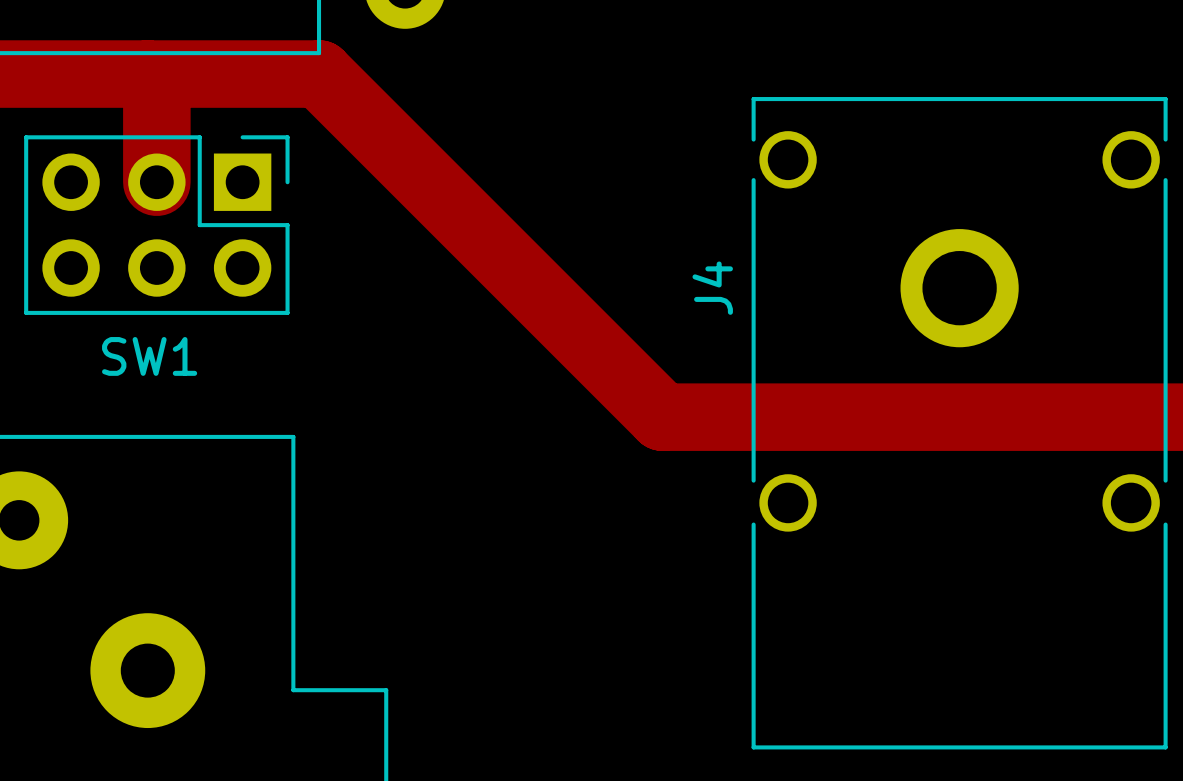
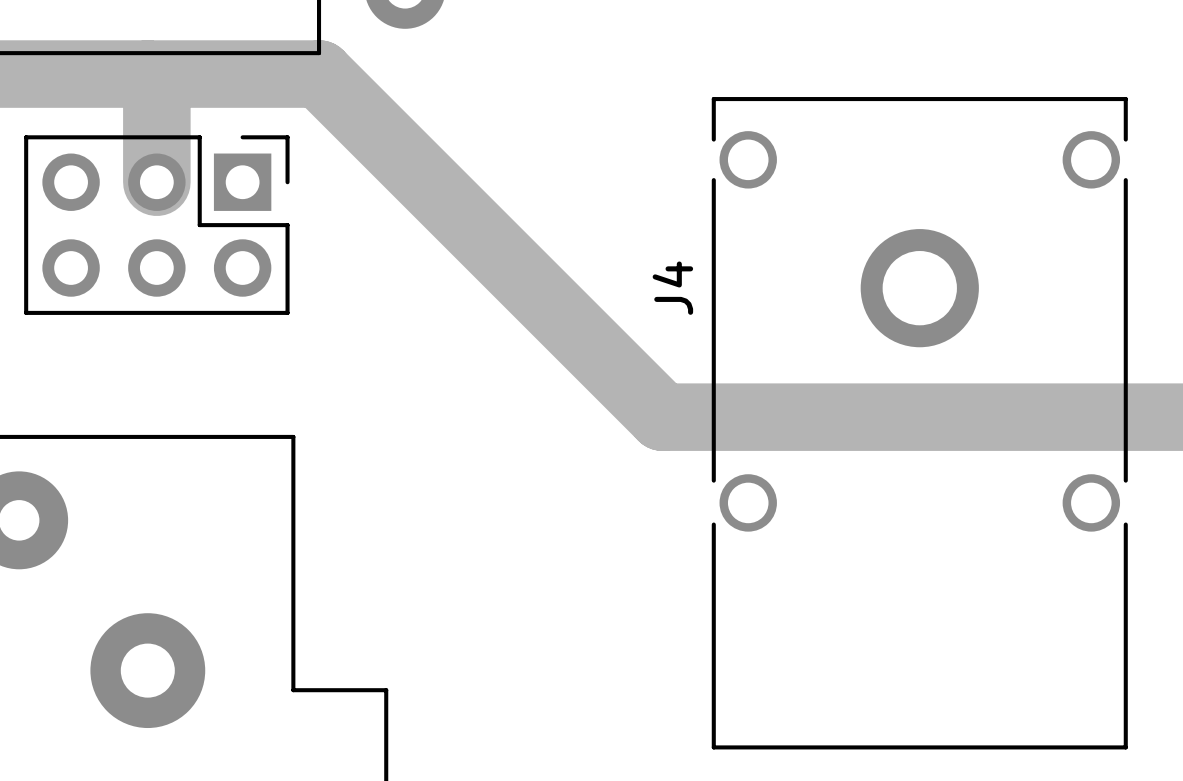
SW1 name: SW1 (149, 356) -> none
J4 position: (959, 423) -> (919, 423)

